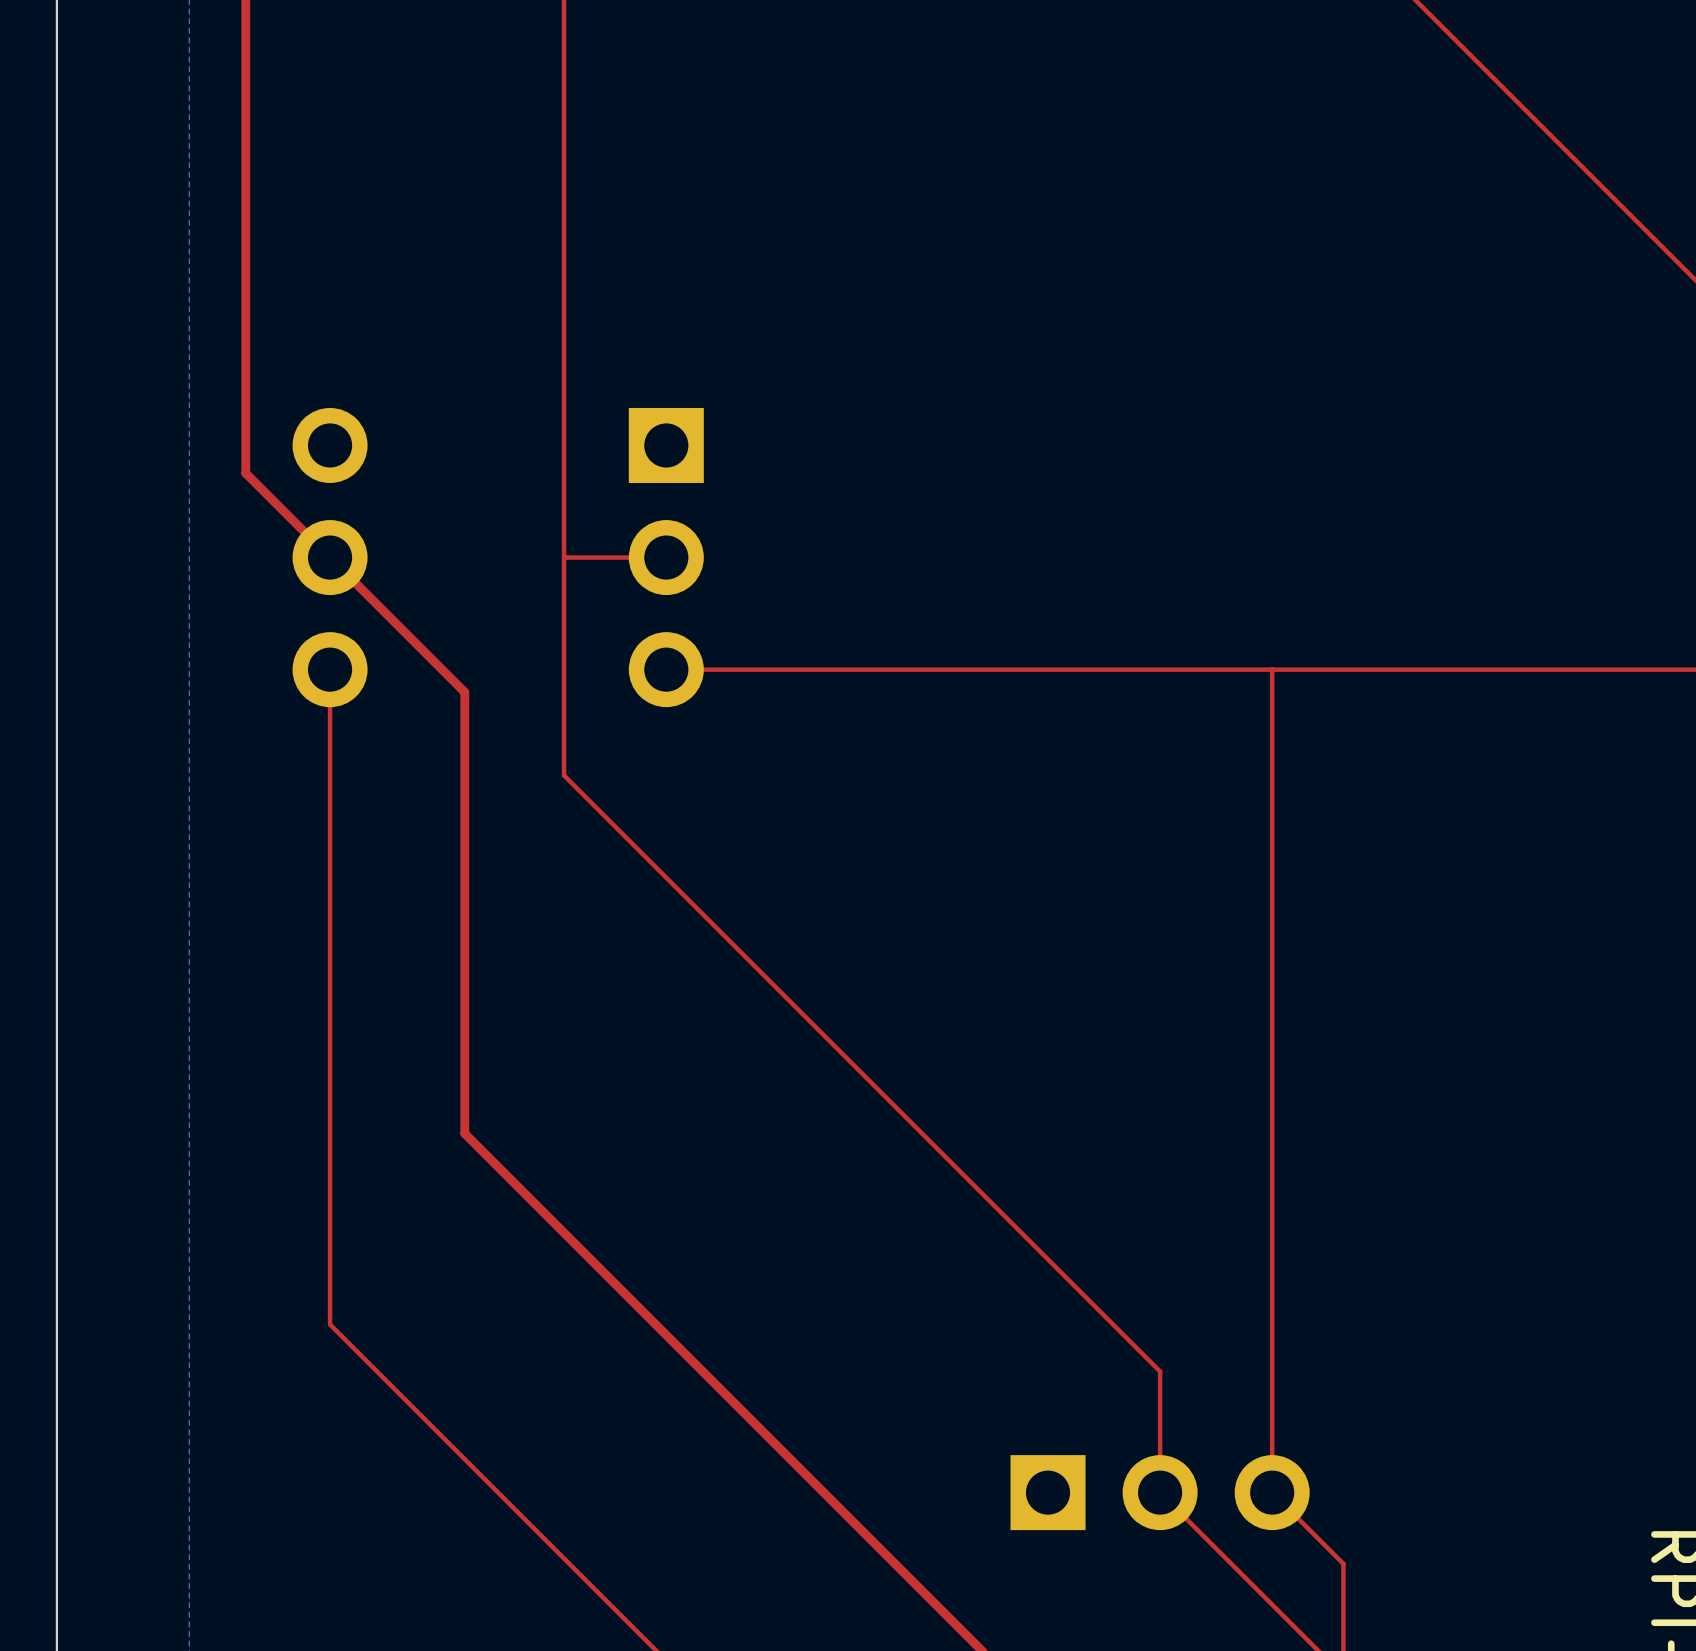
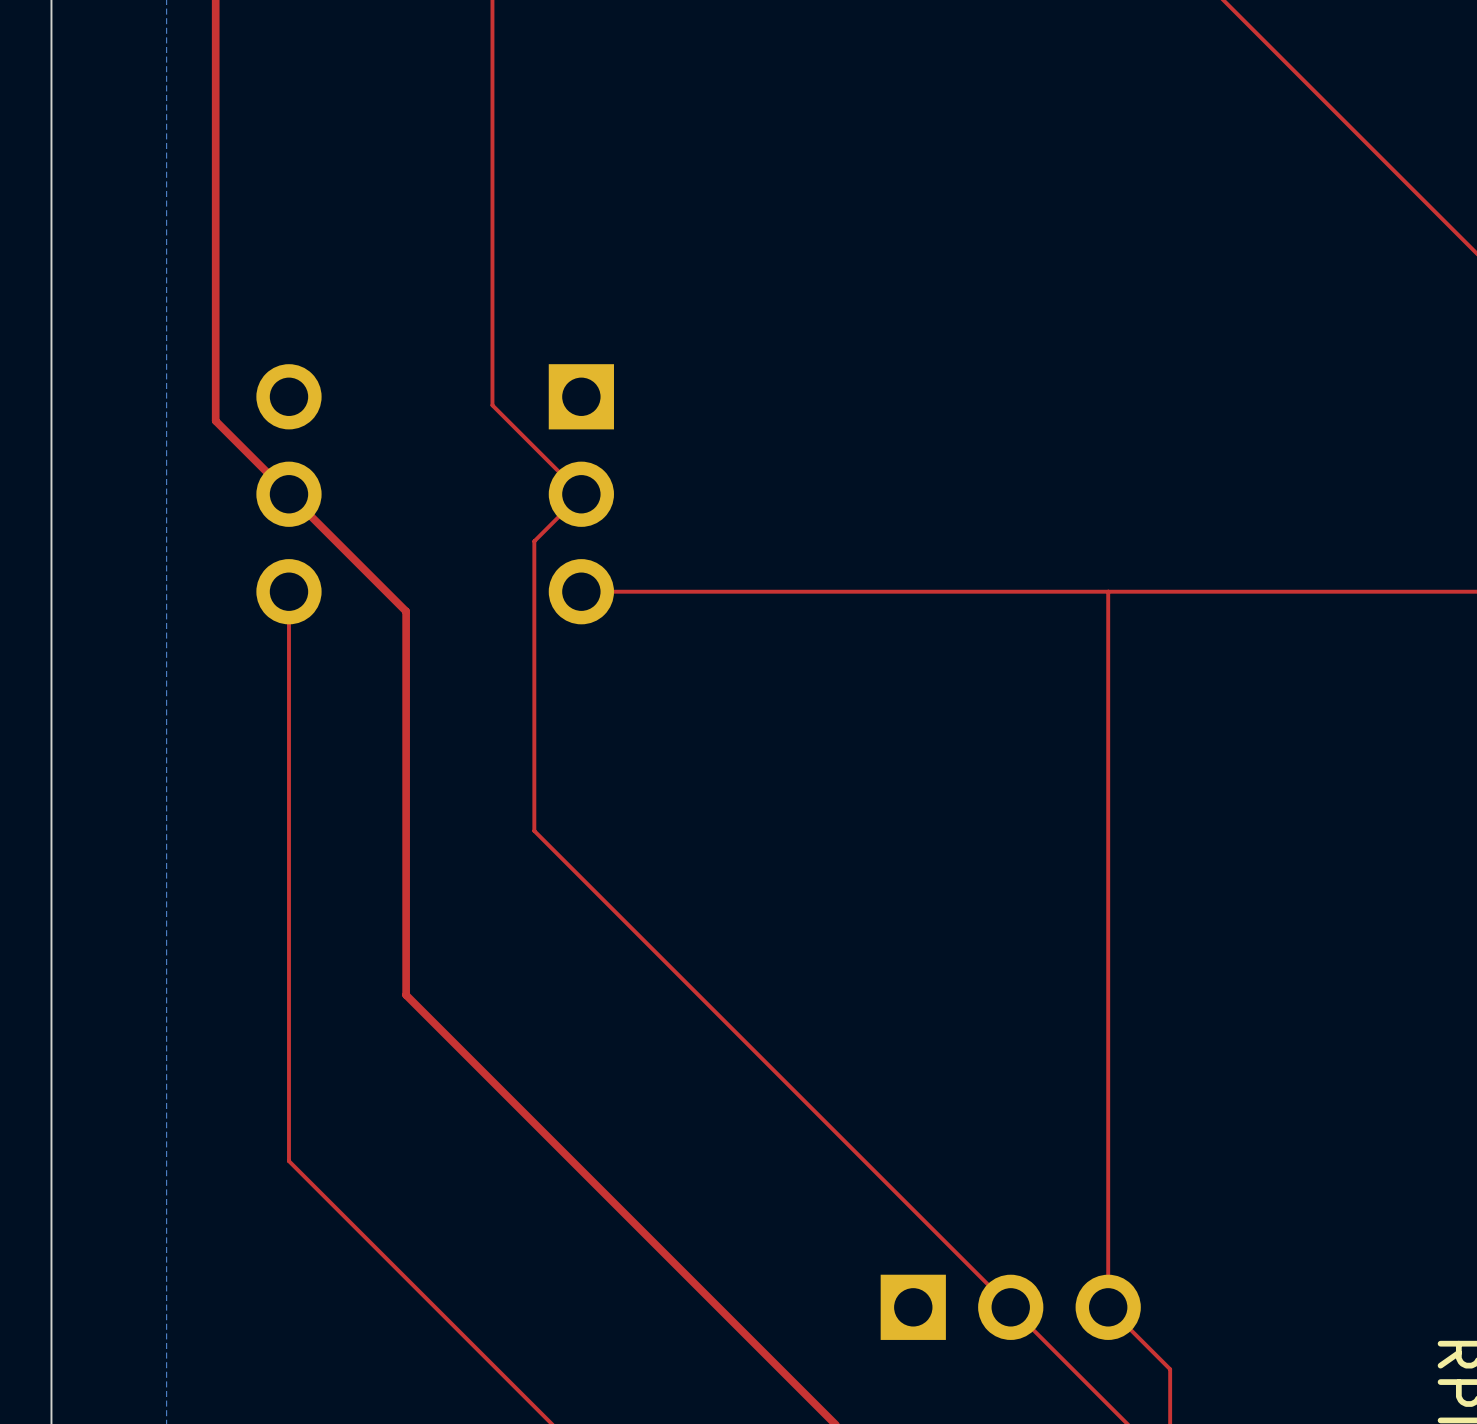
top track: (564, 455) (564, 775) (1160, 1371) (1160, 1492) -> (492, 405) (581, 494) (534, 541) (534, 830) (1010, 1307)
top track: (666, 557) (564, 557) -> none

